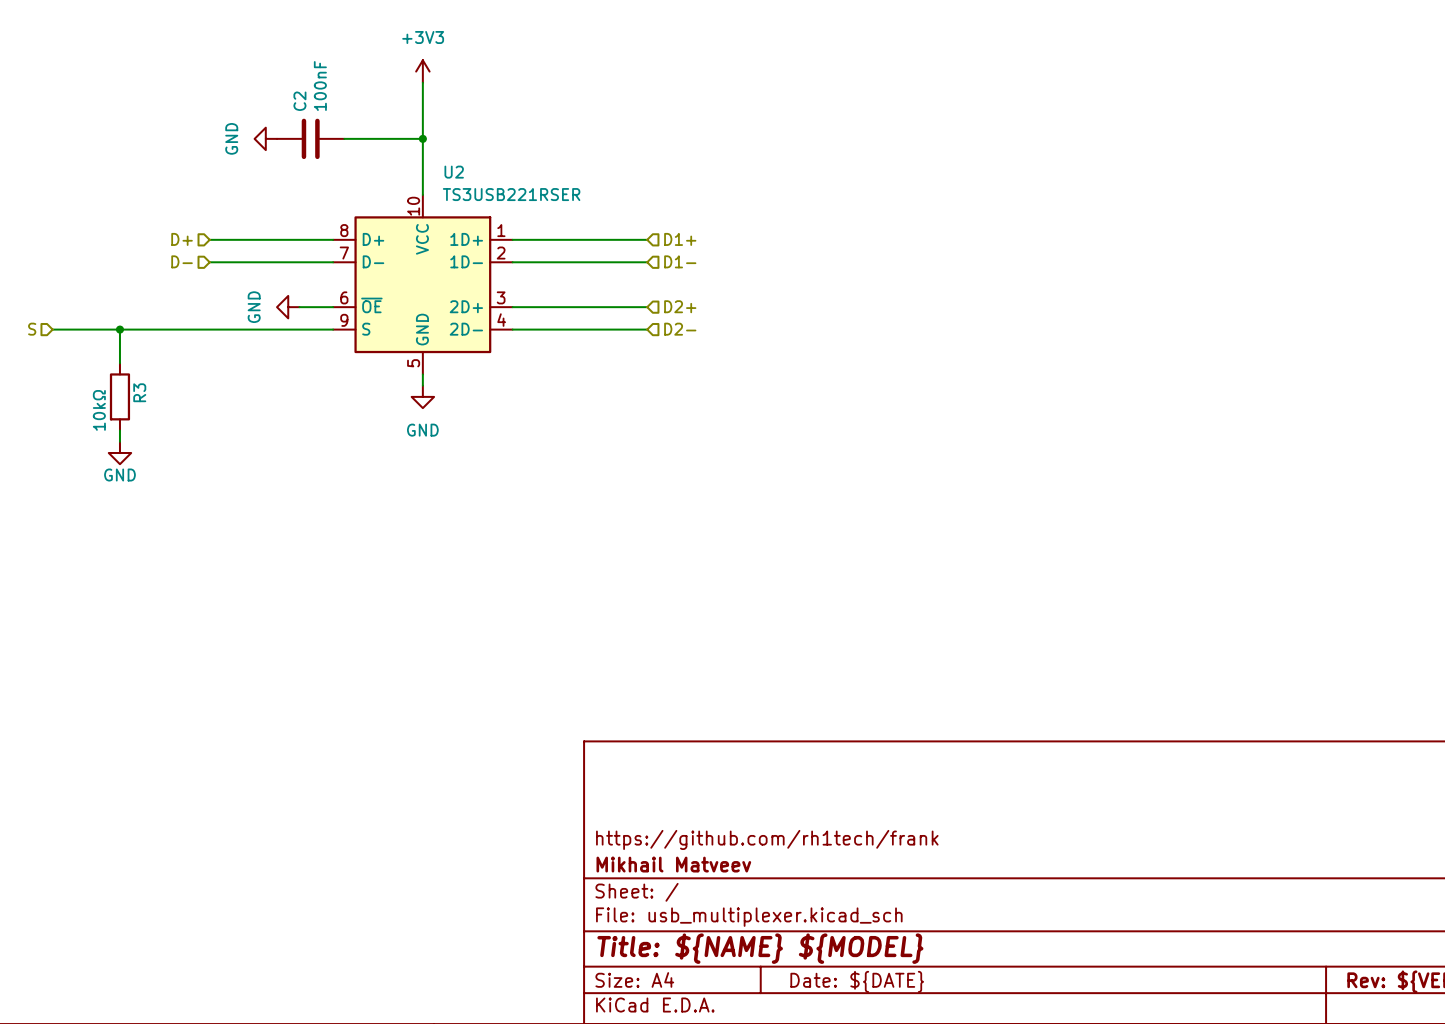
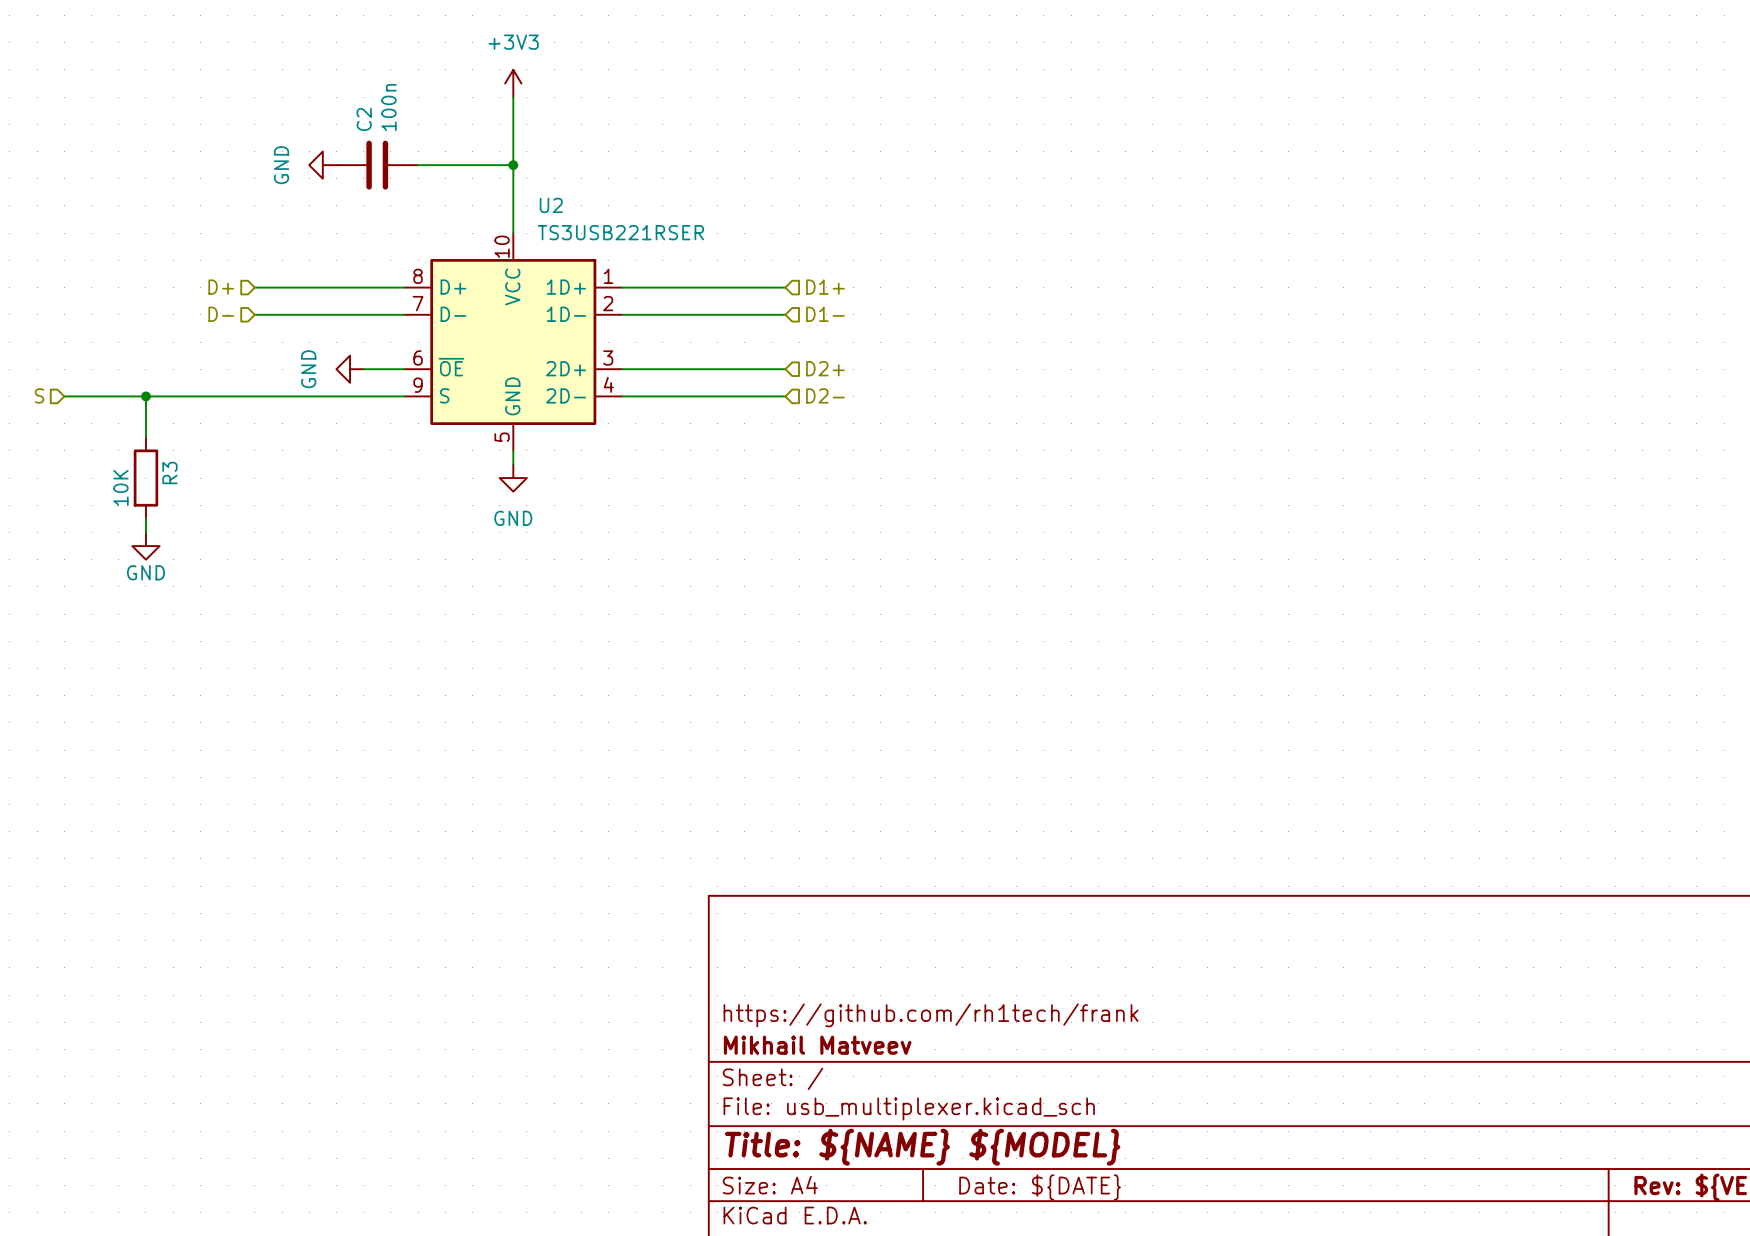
C2 value: 100nF (320, 86) -> 100n (388, 107)
R3 value: 10kΩ (99, 410) -> 10K (120, 487)

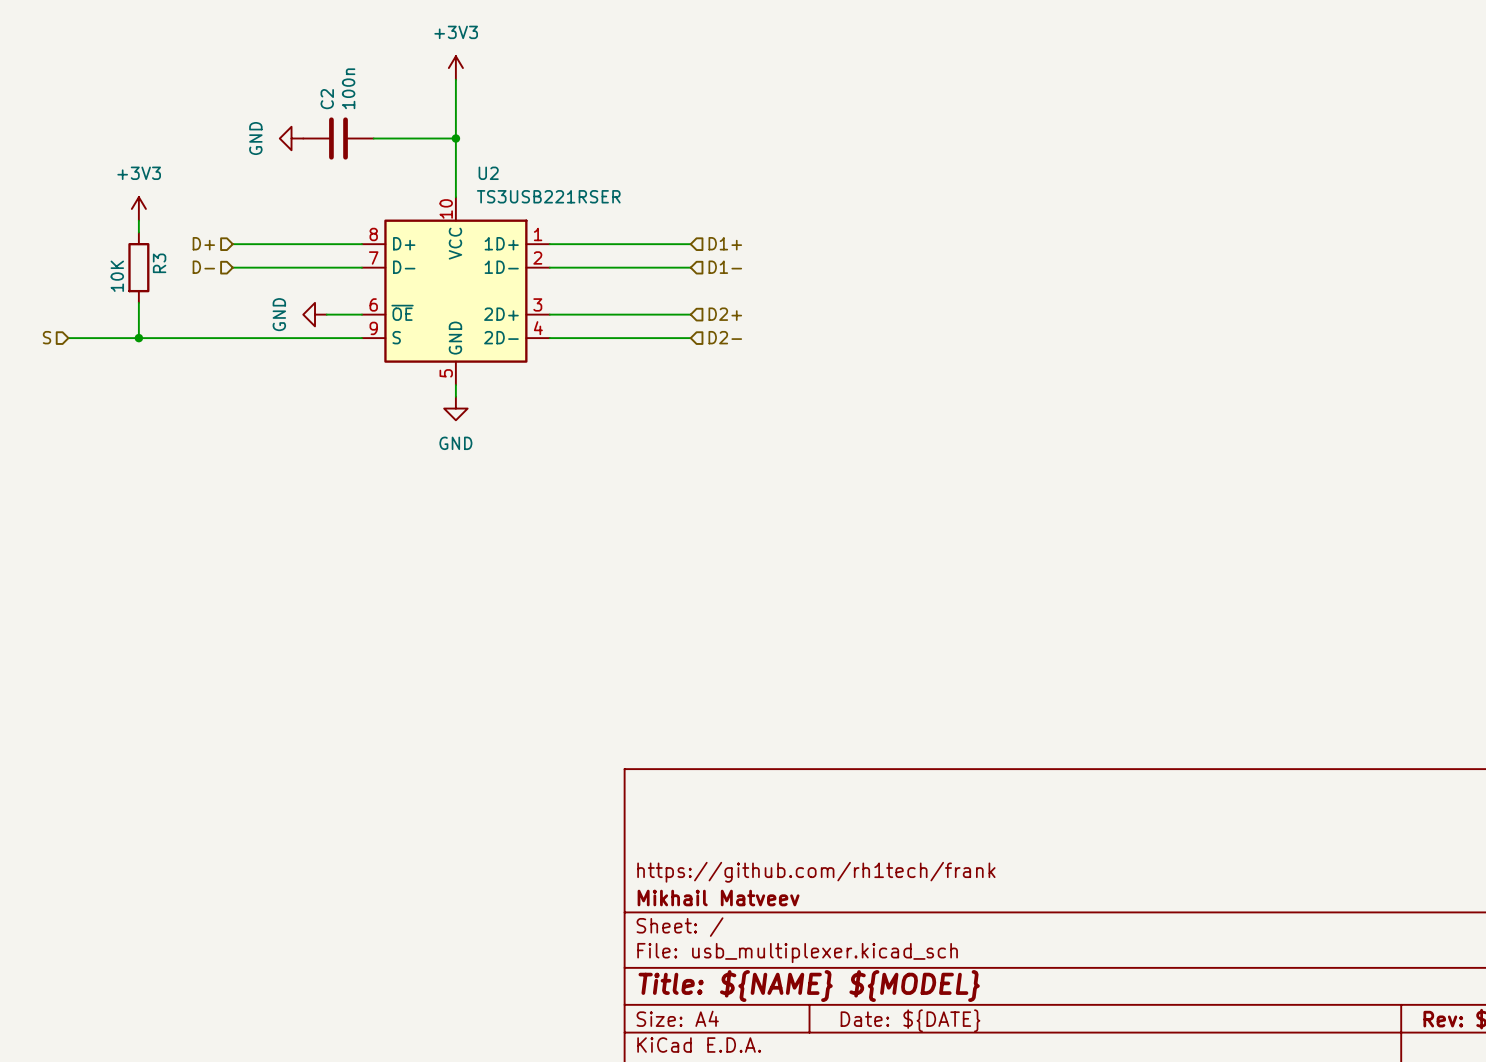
power symbol: none -> +3V3 (138, 208)
wire: (145, 396) (145, 437) -> (138, 338) (138, 302)
R3 position: (145, 478) -> (138, 267)
wire: (145, 518) (145, 532) -> (138, 220) (138, 232)
power symbol: GND (145, 546) -> none

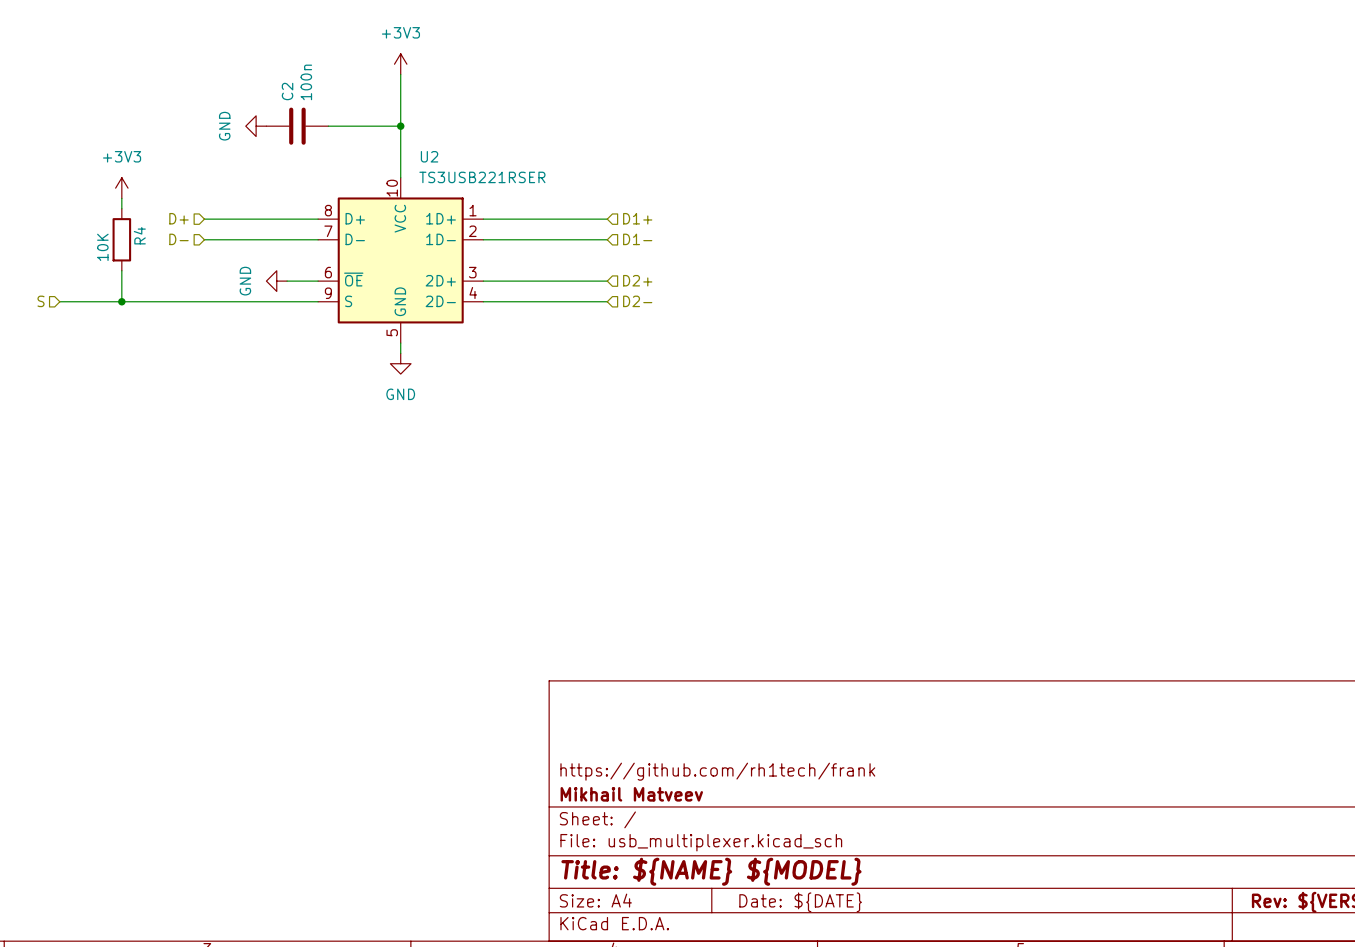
R3 name: R3 (159, 263) -> R4 (139, 235)

